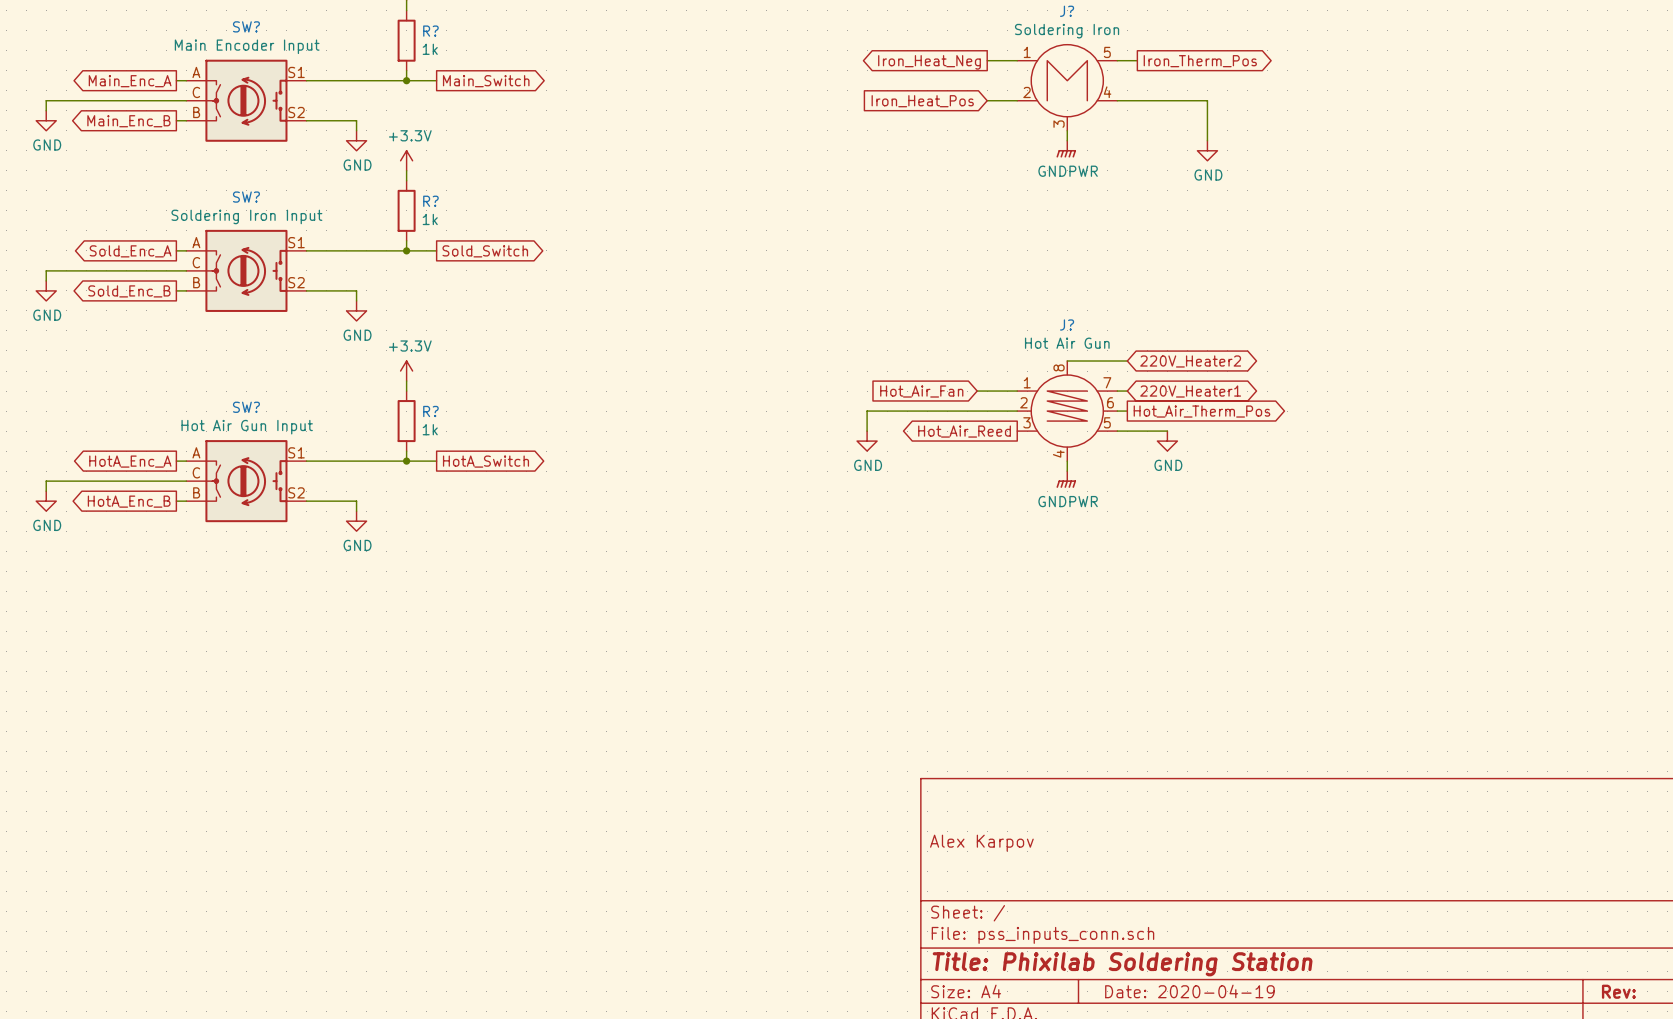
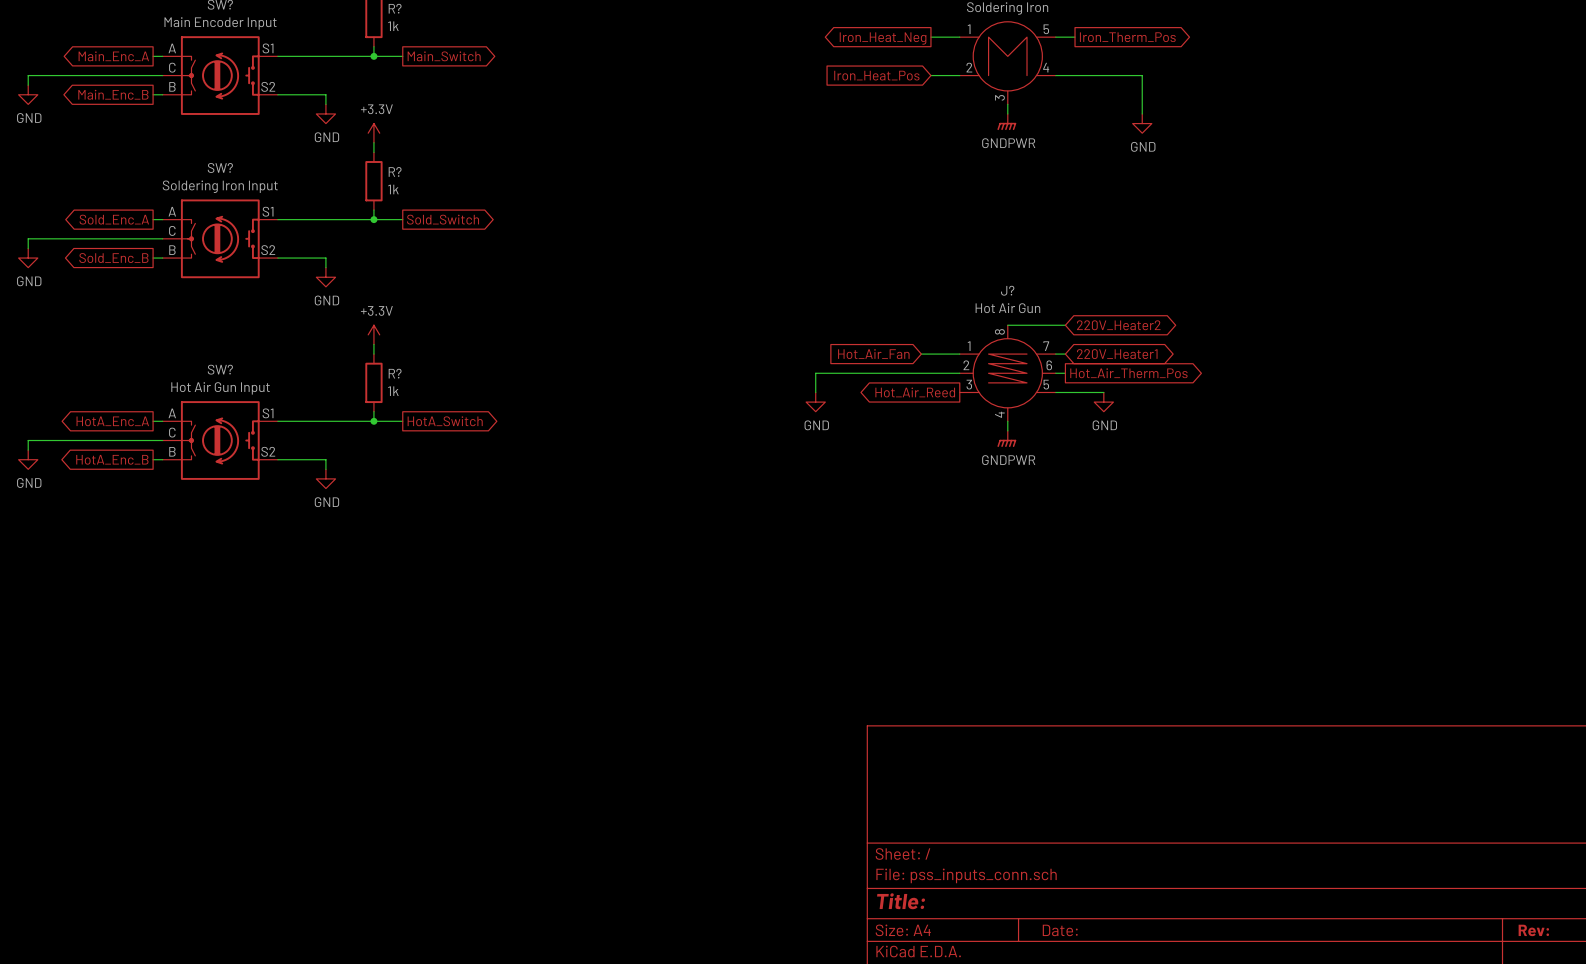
title block: Alex Karpov (981, 843) -> none
title block: Title: Phixilab Soldering Station (1122, 964) -> Title: (901, 901)
title block: Date: 2020-04-19 (1189, 991) -> Date: (1060, 930)

